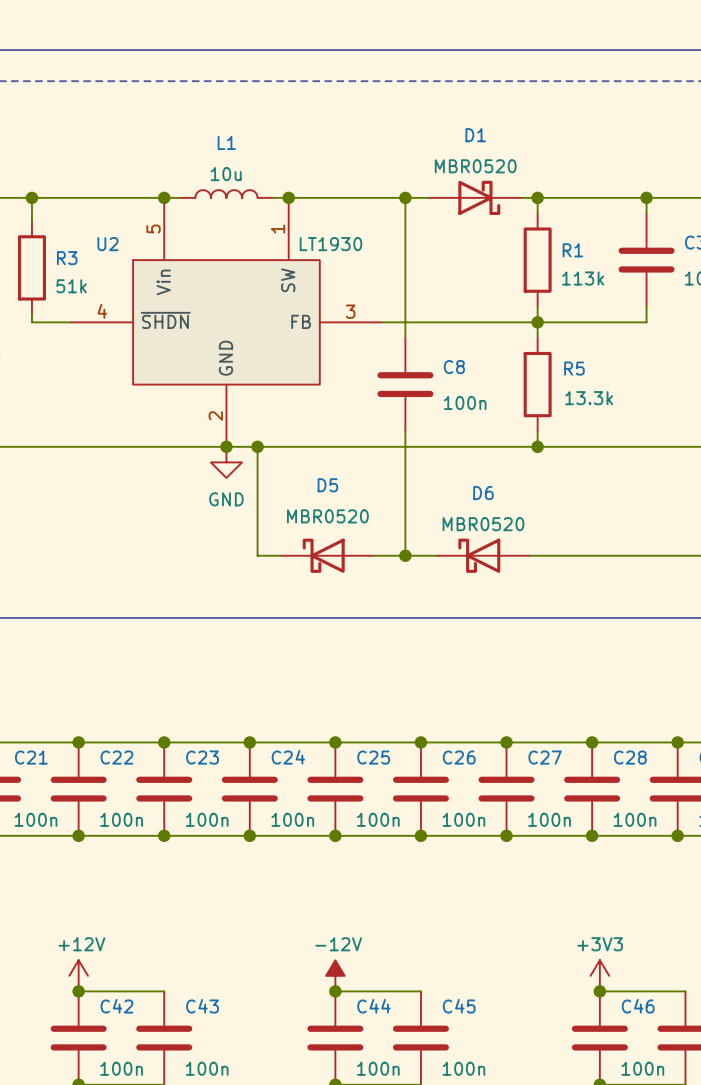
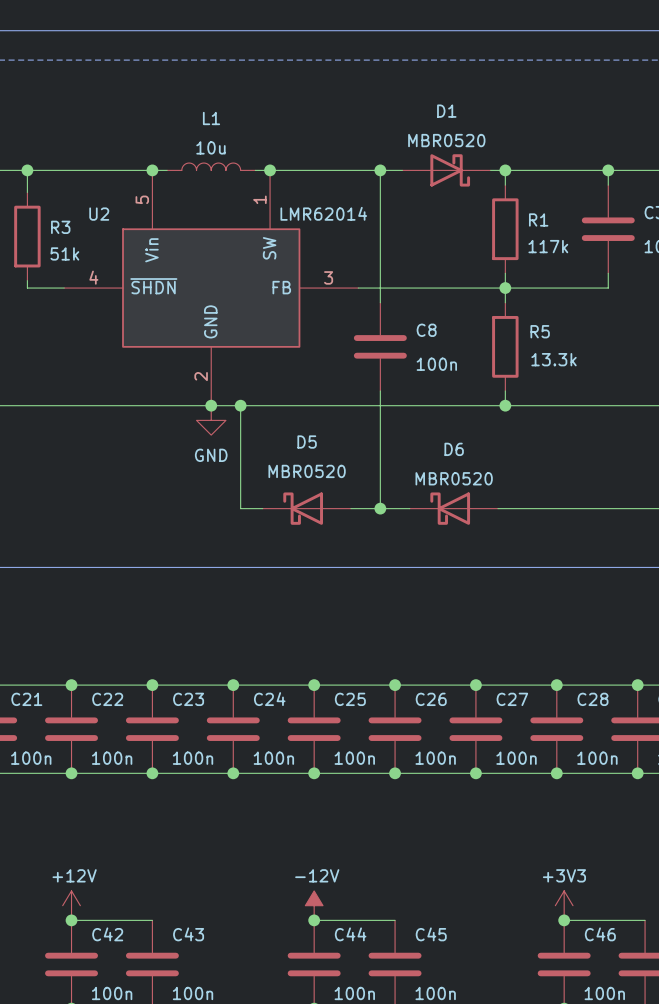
U2 value: LT1930 (330, 244) -> LMR62014 (323, 213)
R1 value: 113k (583, 278) -> 117k (548, 246)

